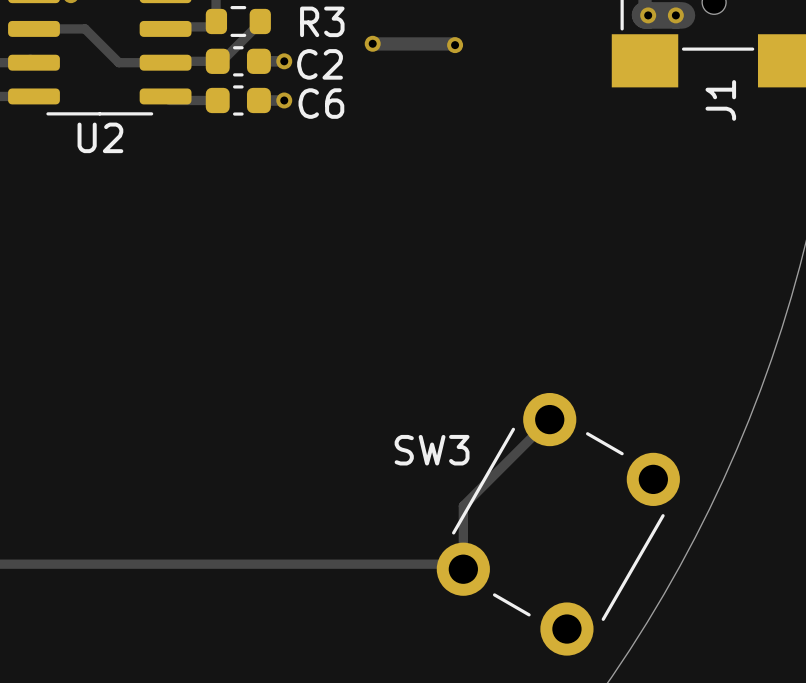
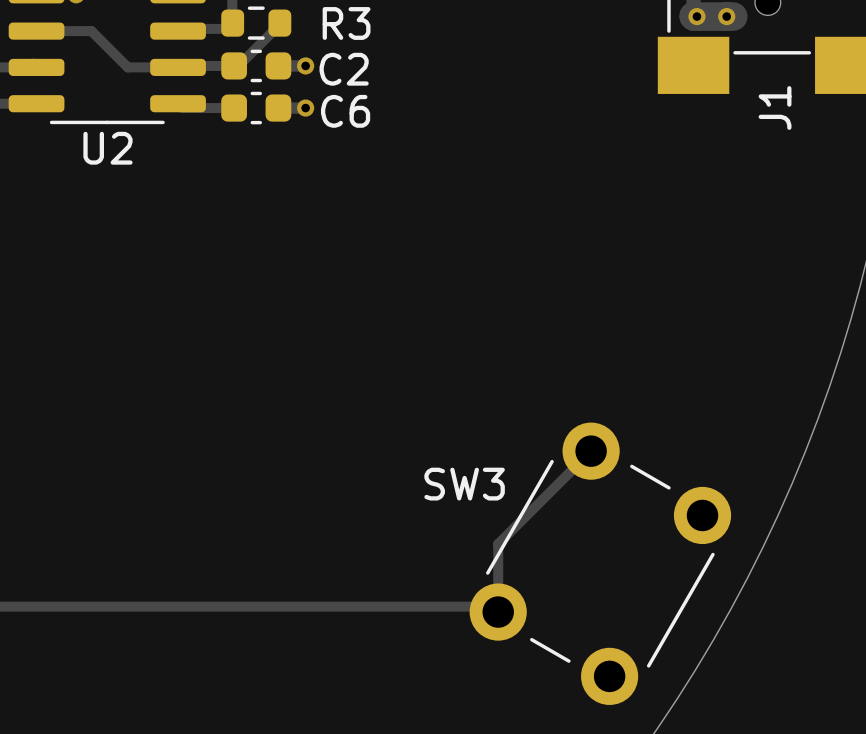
track: (372, 43) (455, 45) -> none
via: (372, 43) -> none
via: (455, 45) -> none

